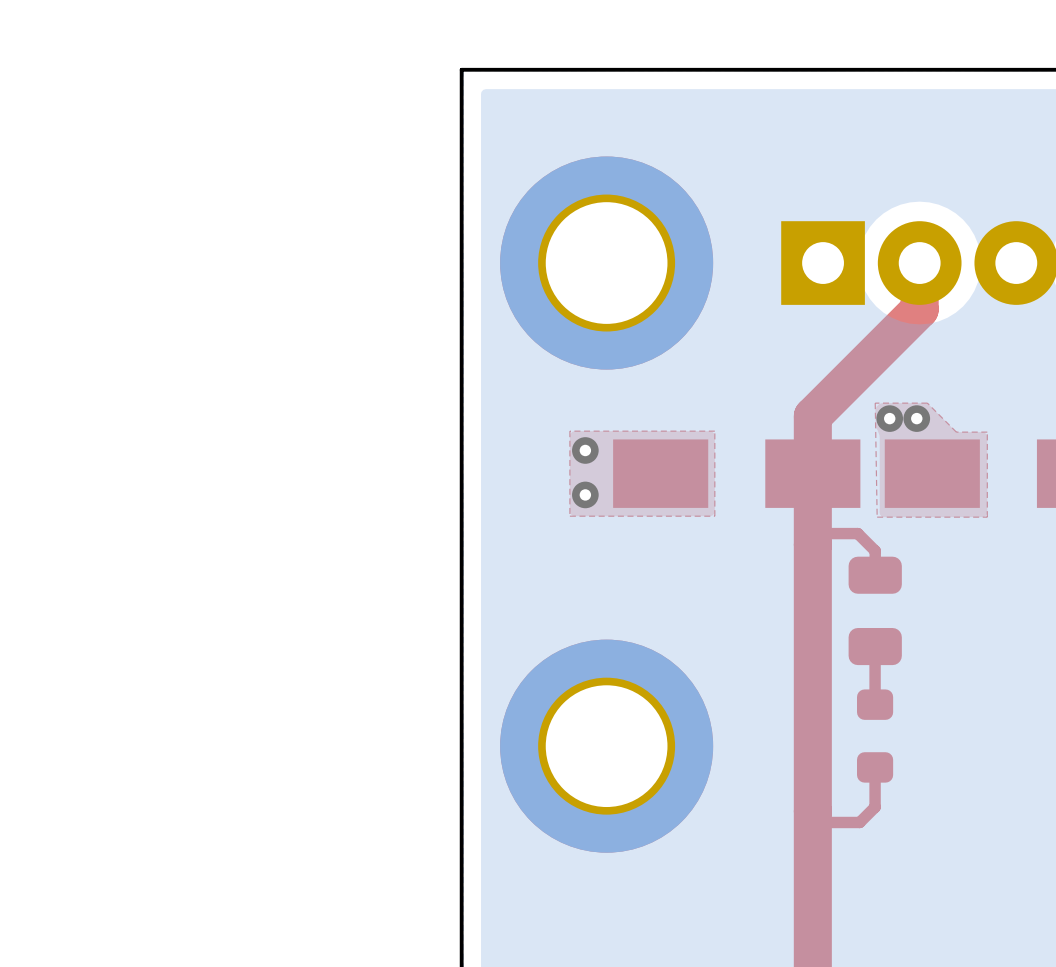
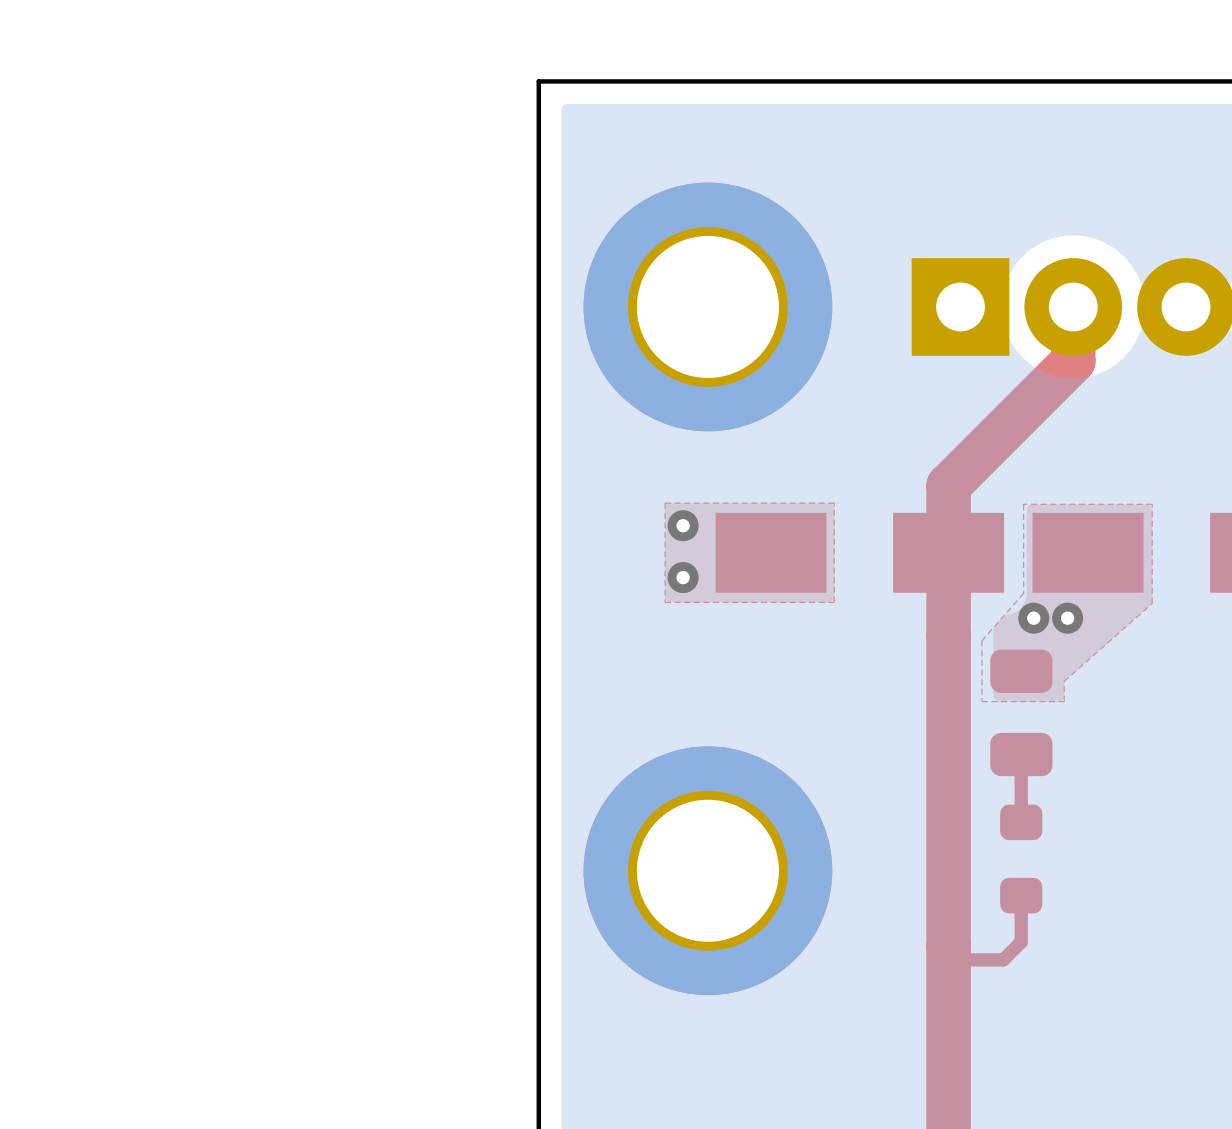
via: (889, 418) -> none
via: (916, 418) -> none
top zone outline: (956, 432) (927, 403) (875, 403) (877, 517) (987, 517) -> (1116, 504) (1023, 504) (1023, 593) (981, 640) (981, 701) (1064, 701) (1064, 681) (1152, 603)
via: none -> (1033, 618)
via: none -> (1067, 618)
top track: (812, 544) (824, 533) (857, 533) (875, 550) (875, 575) -> none

